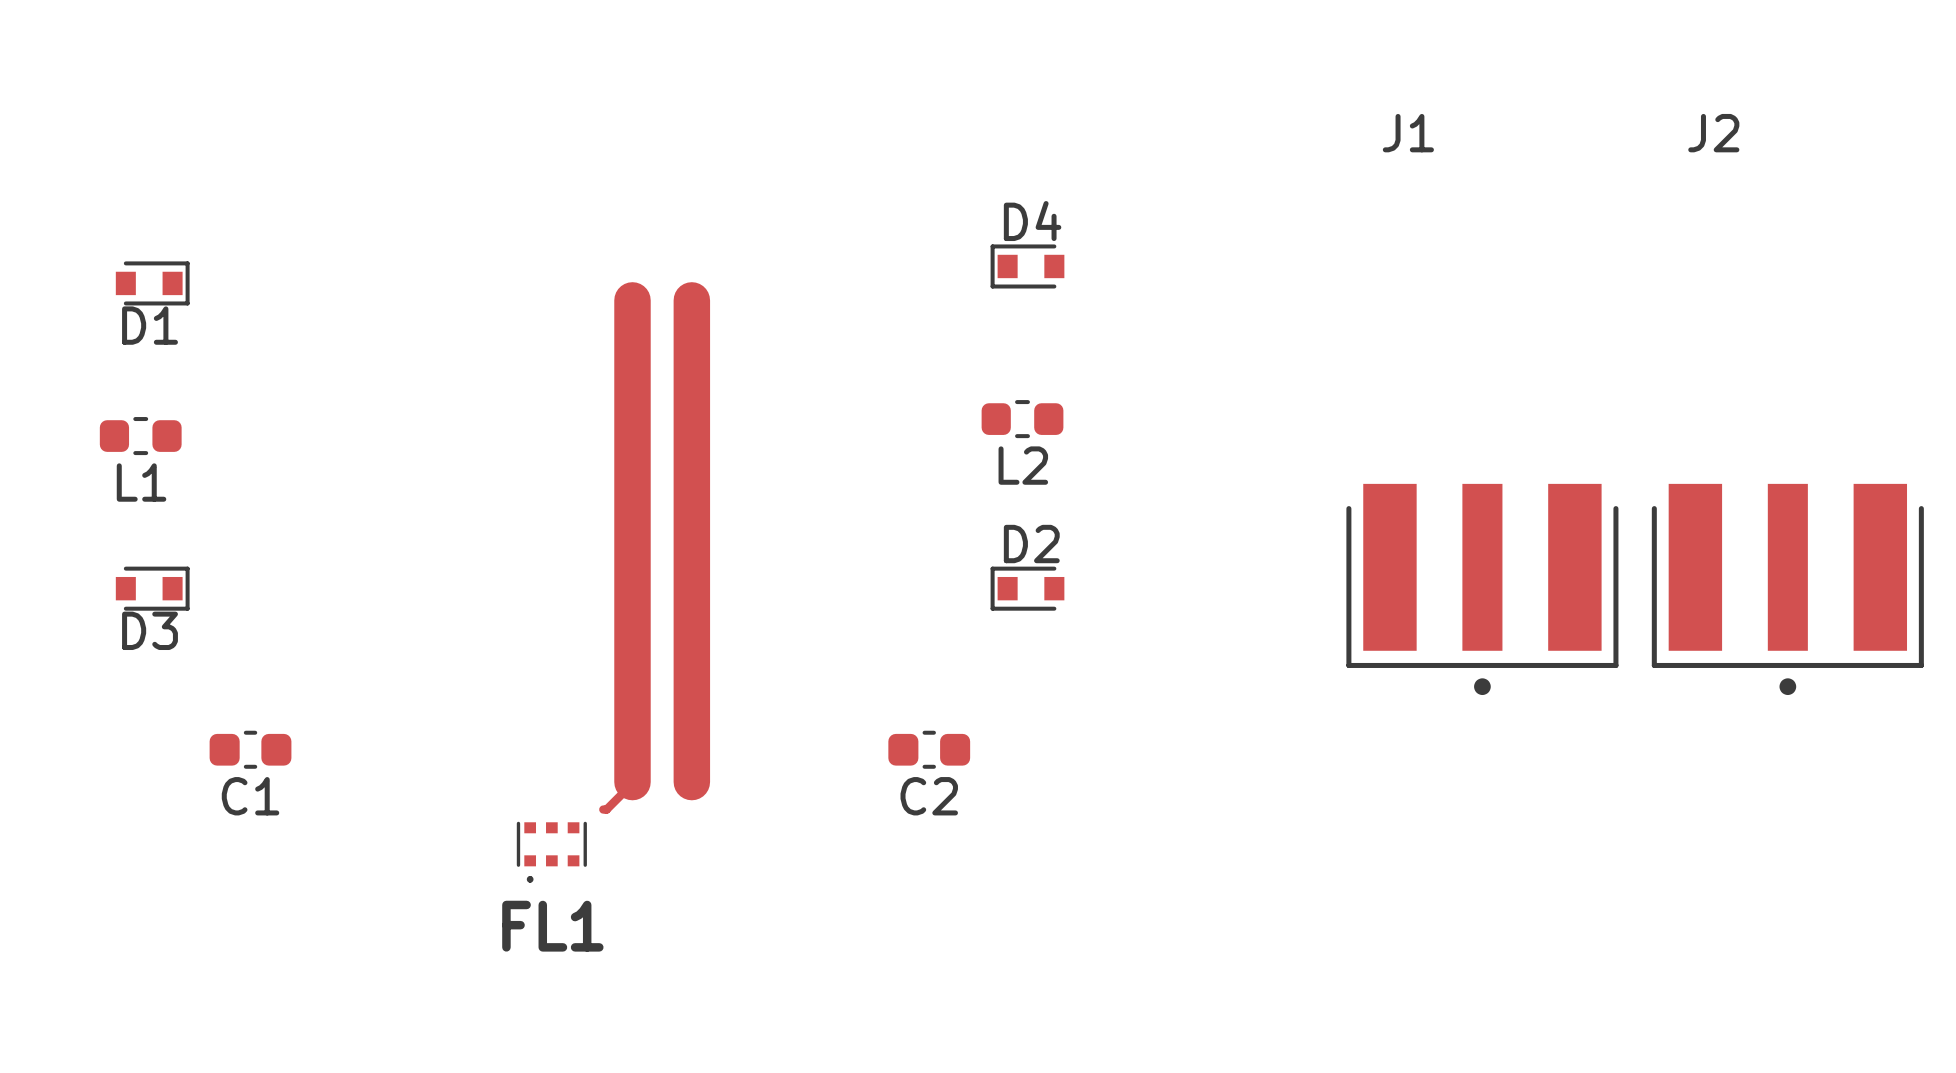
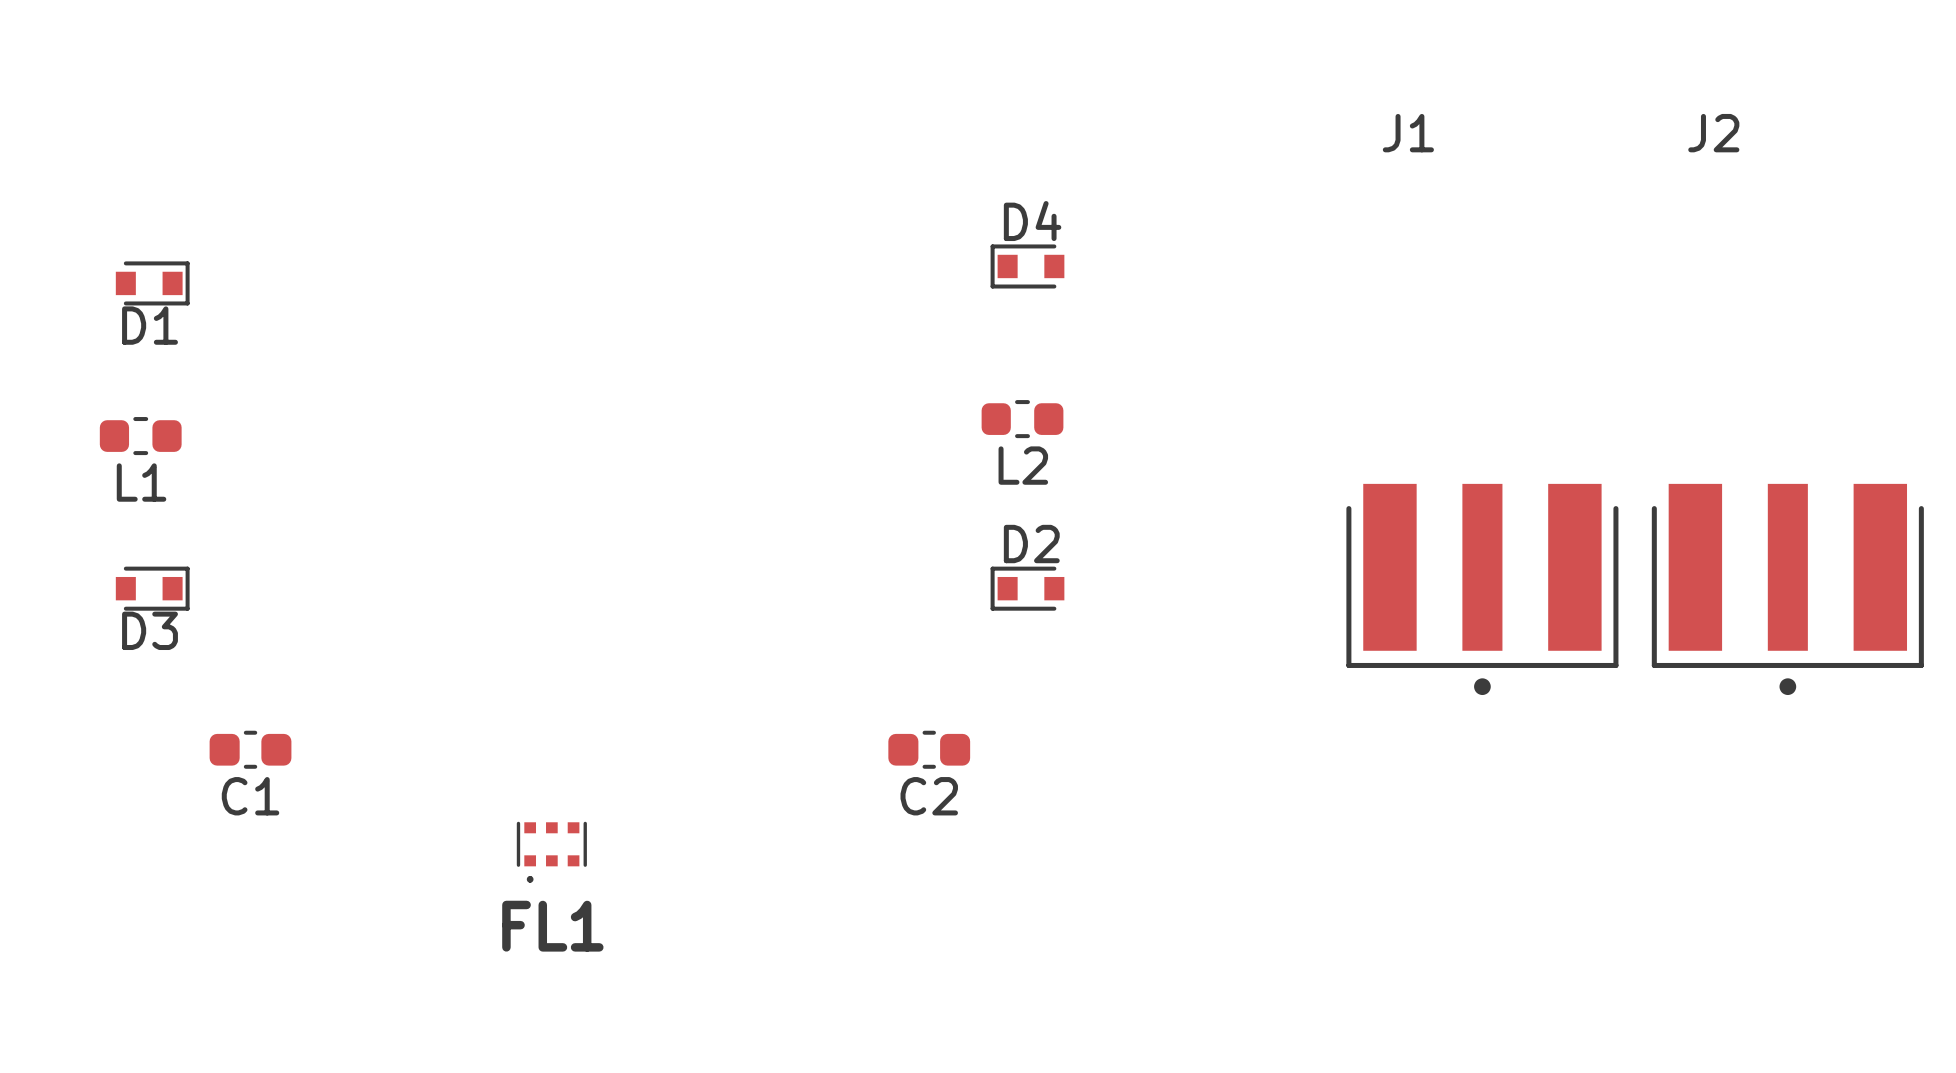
track: (632, 300) (632, 782) -> none
track: (691, 300) (691, 782) -> none
track: (632, 783) (606, 809) (603, 809) -> none

